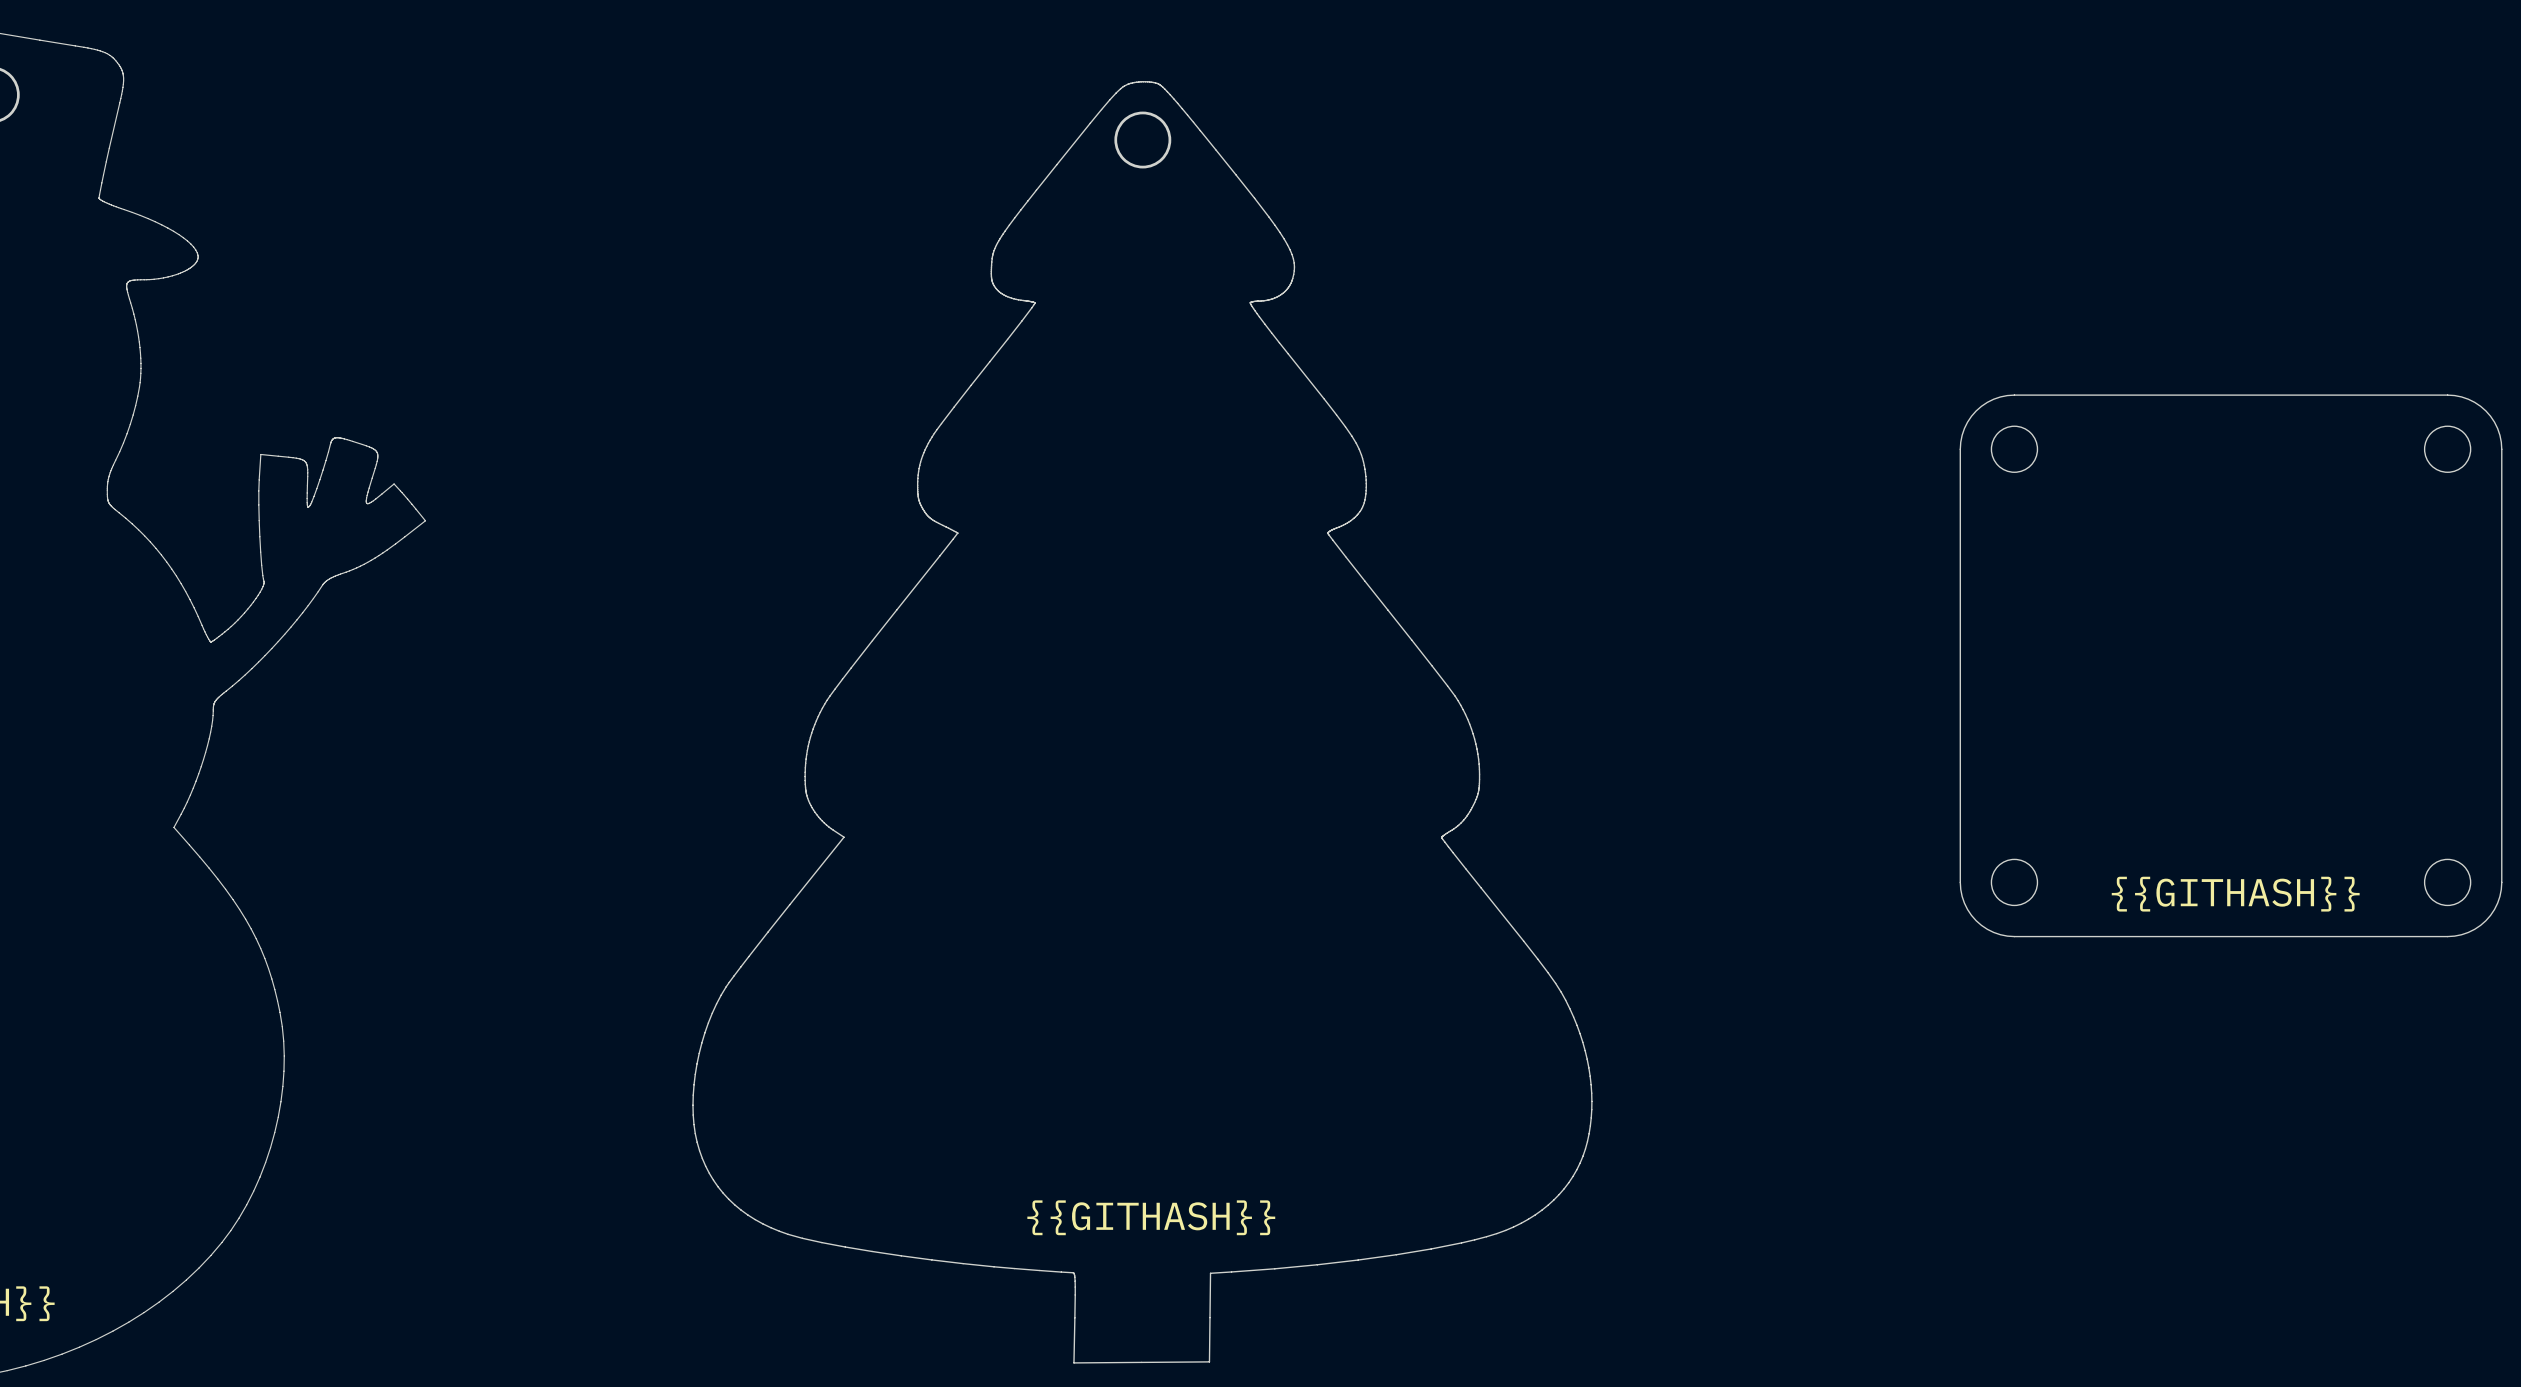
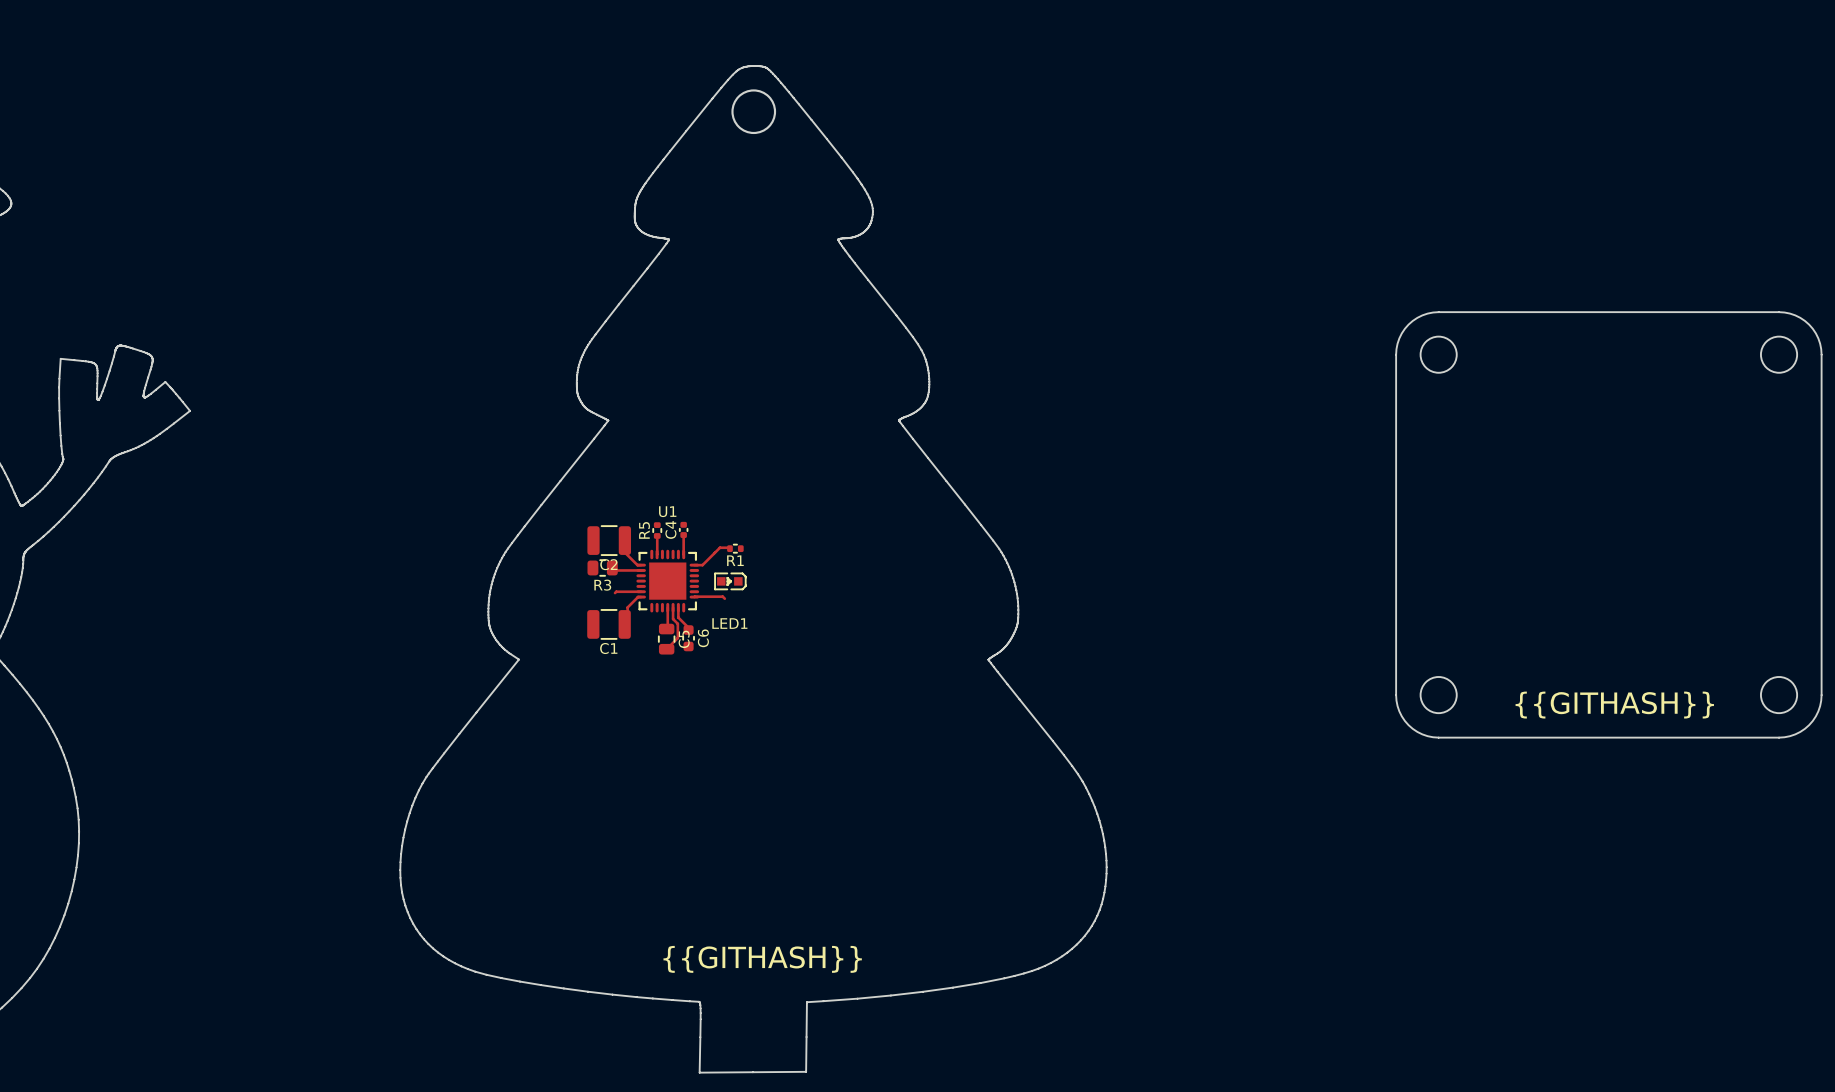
C4: none -> (683, 529)
R5: none -> (657, 530)
top track: none -> (683, 535) (683, 554)
top track: none -> (657, 535) (657, 554)
C2: none -> (609, 540)
top track: none -> (624, 541) (624, 552) (637, 565) (641, 565)
top track: none -> (729, 548) (719, 547) (702, 565) (694, 565)
R1: none -> (735, 548)
R3: none -> (602, 567)
top track: none -> (614, 569) (641, 570)
LED1: none -> (730, 581)
U1: none -> (667, 582)
top track: none -> (641, 591) (615, 593)
top track: none -> (641, 597) (638, 597) (627, 607) (627, 620)
top track: none -> (694, 597) (722, 596) (724, 598)
top track: none -> (667, 607) (666, 629)
top track: none -> (673, 607) (673, 619) (677, 623) (677, 638) (666, 649)
top track: none -> (678, 607) (678, 617) (688, 630)
C1: none -> (609, 624)
C6: none -> (688, 638)
C5: none -> (666, 639)

